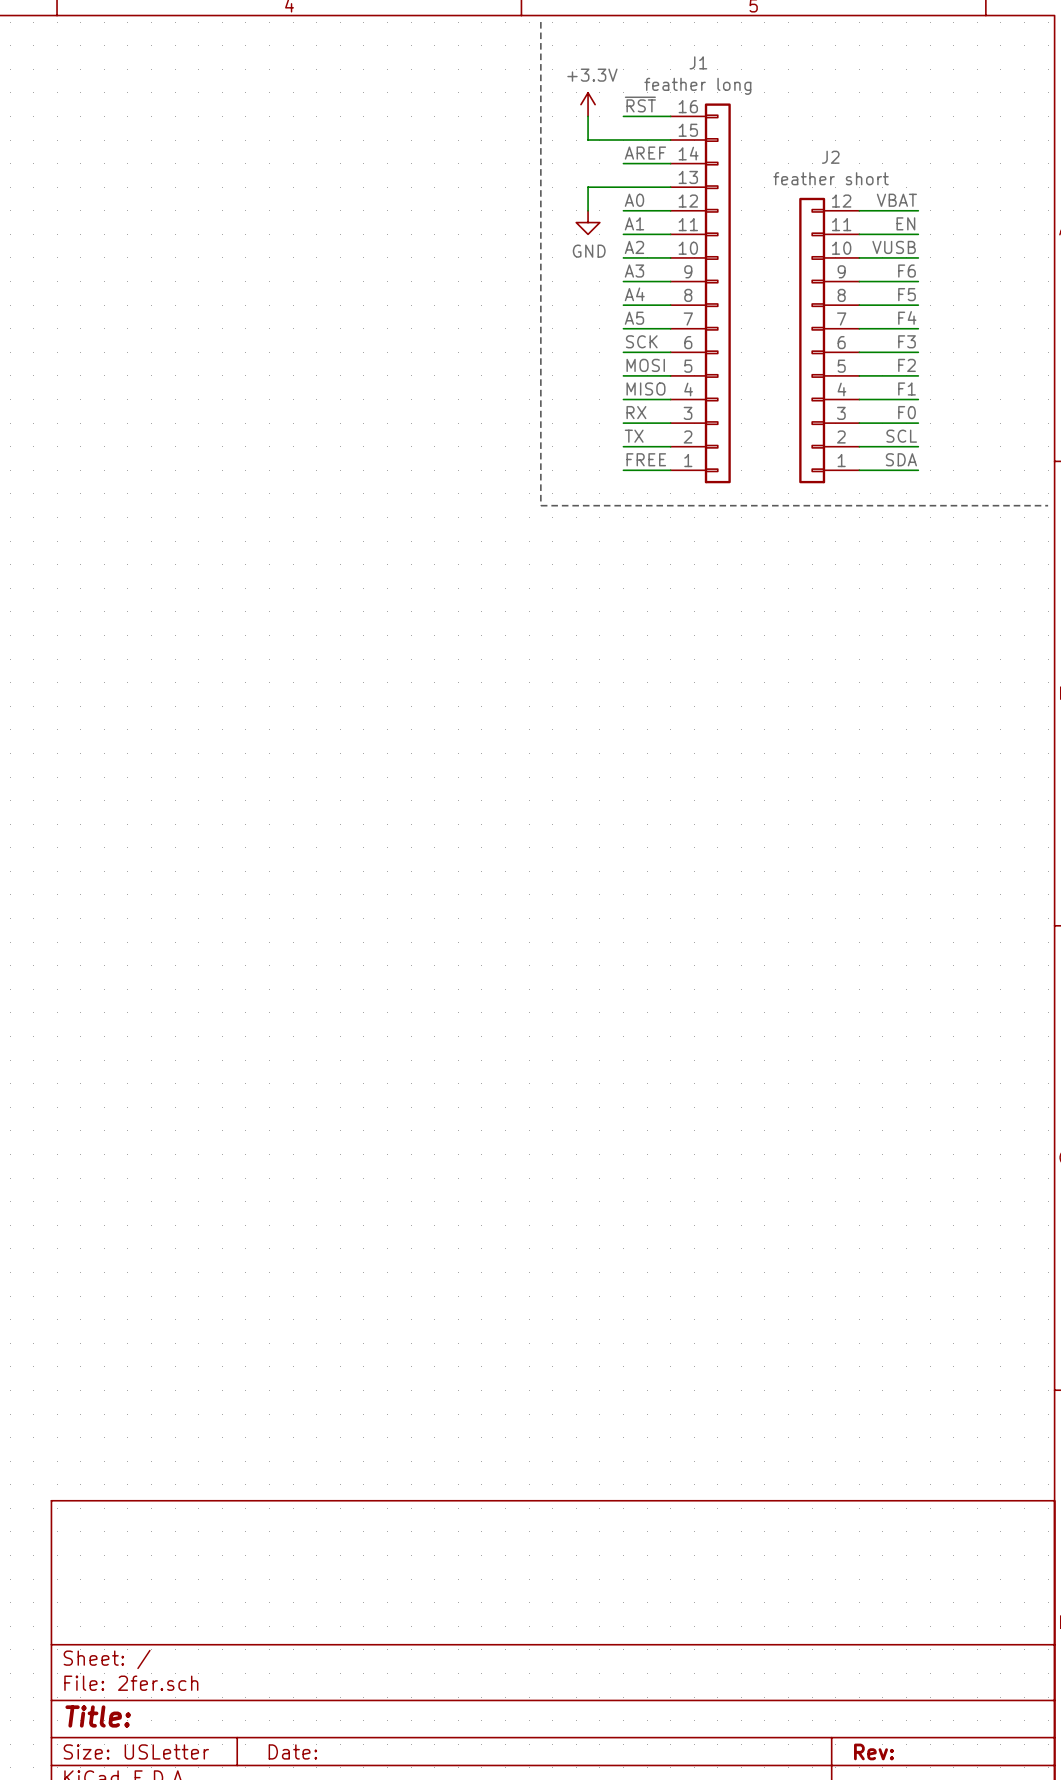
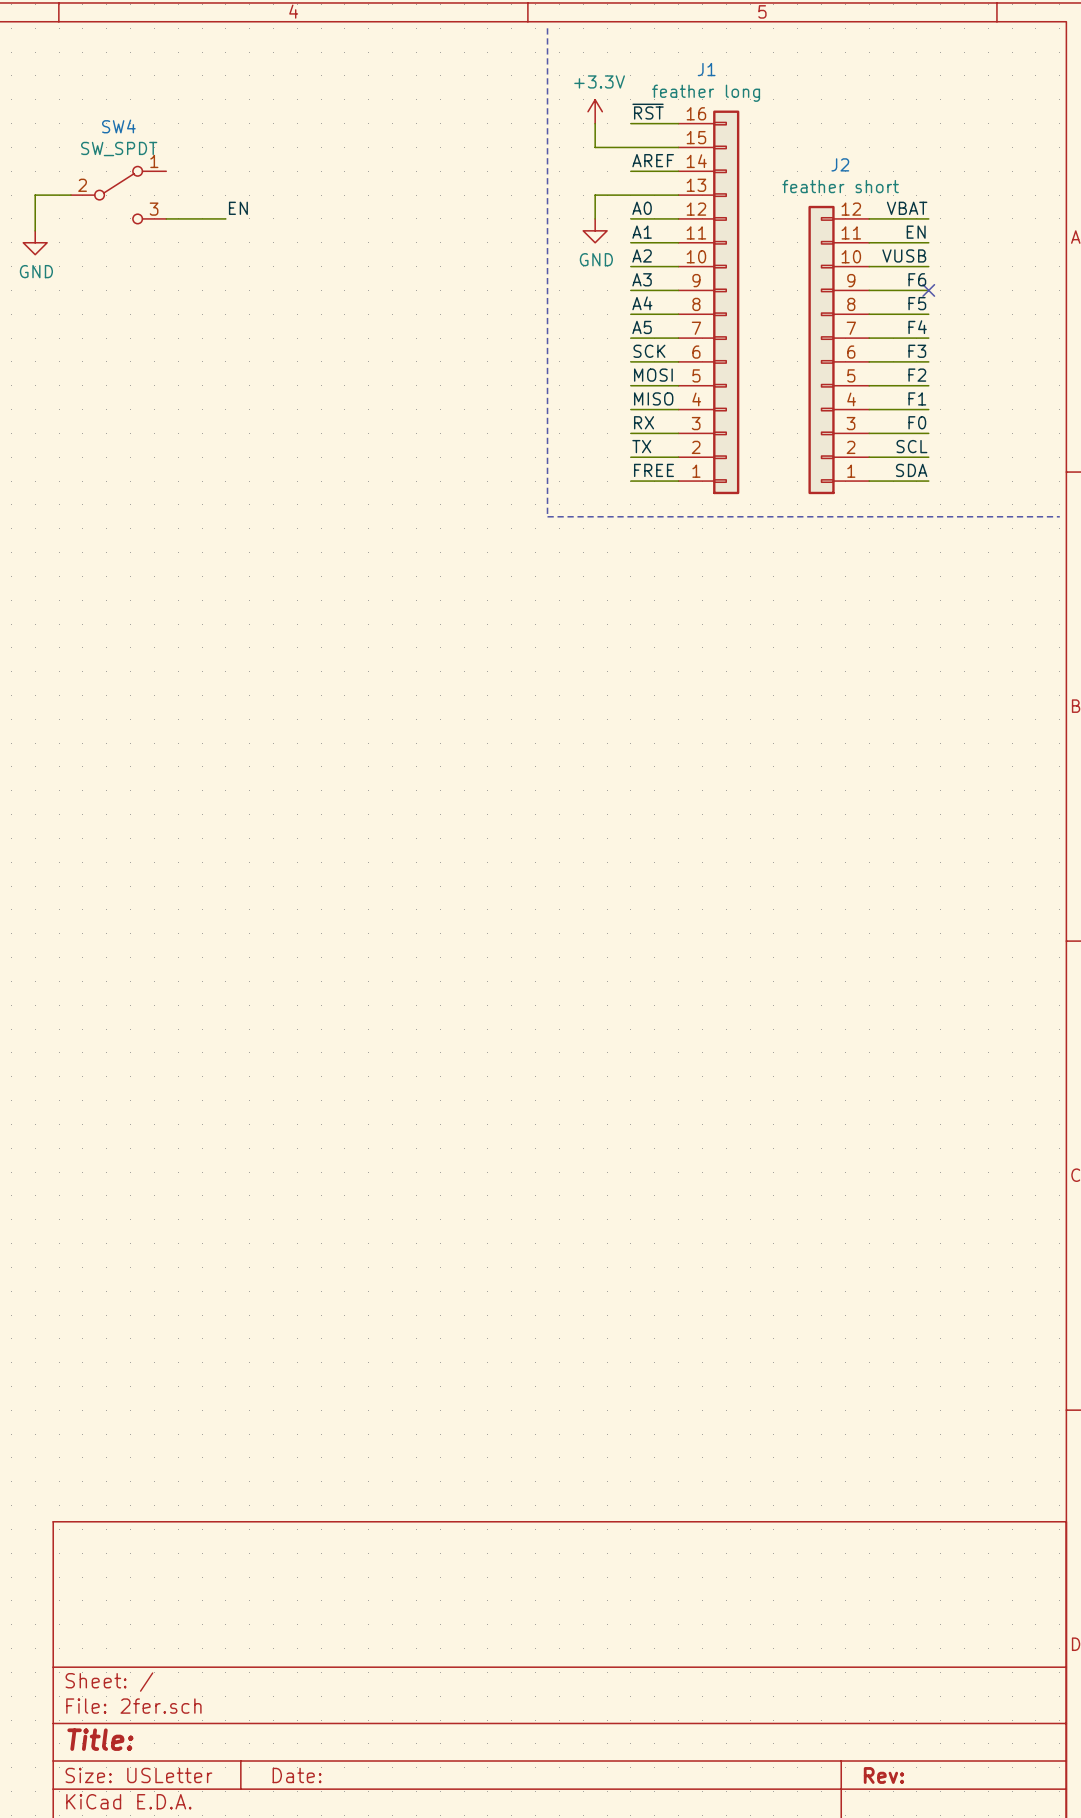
wire: none -> (70, 195) (35, 195) (35, 230)
SW4: none -> SW_SPDT (118, 195)
label: none -> EN (238, 208)
wire: none -> (166, 218) (225, 218)
power symbol: none -> GND (35, 242)
no-connect mark: none -> (928, 290)

